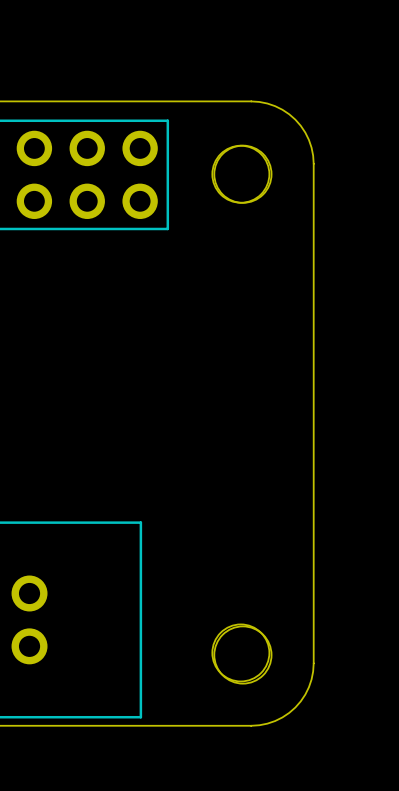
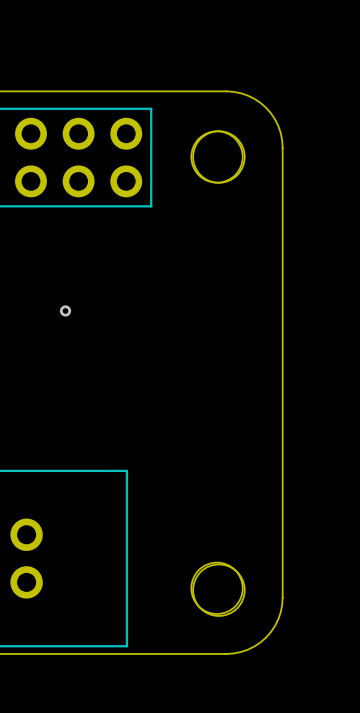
via: none -> (65, 310)

